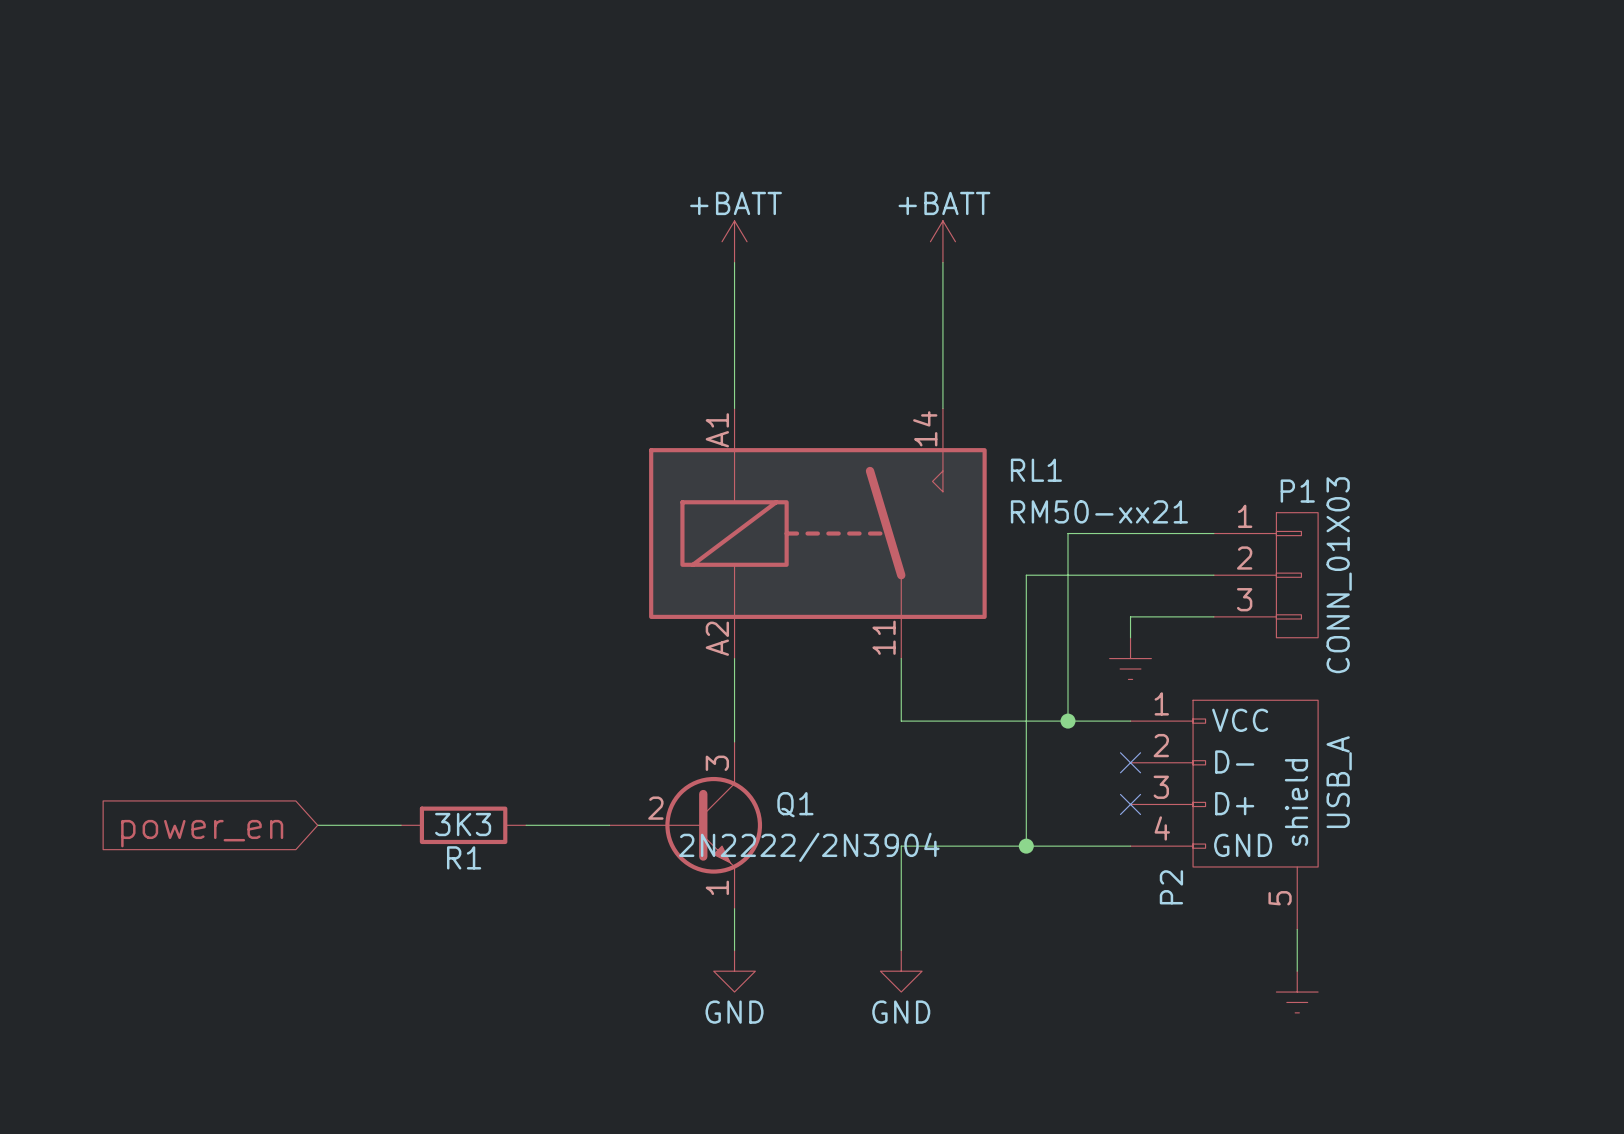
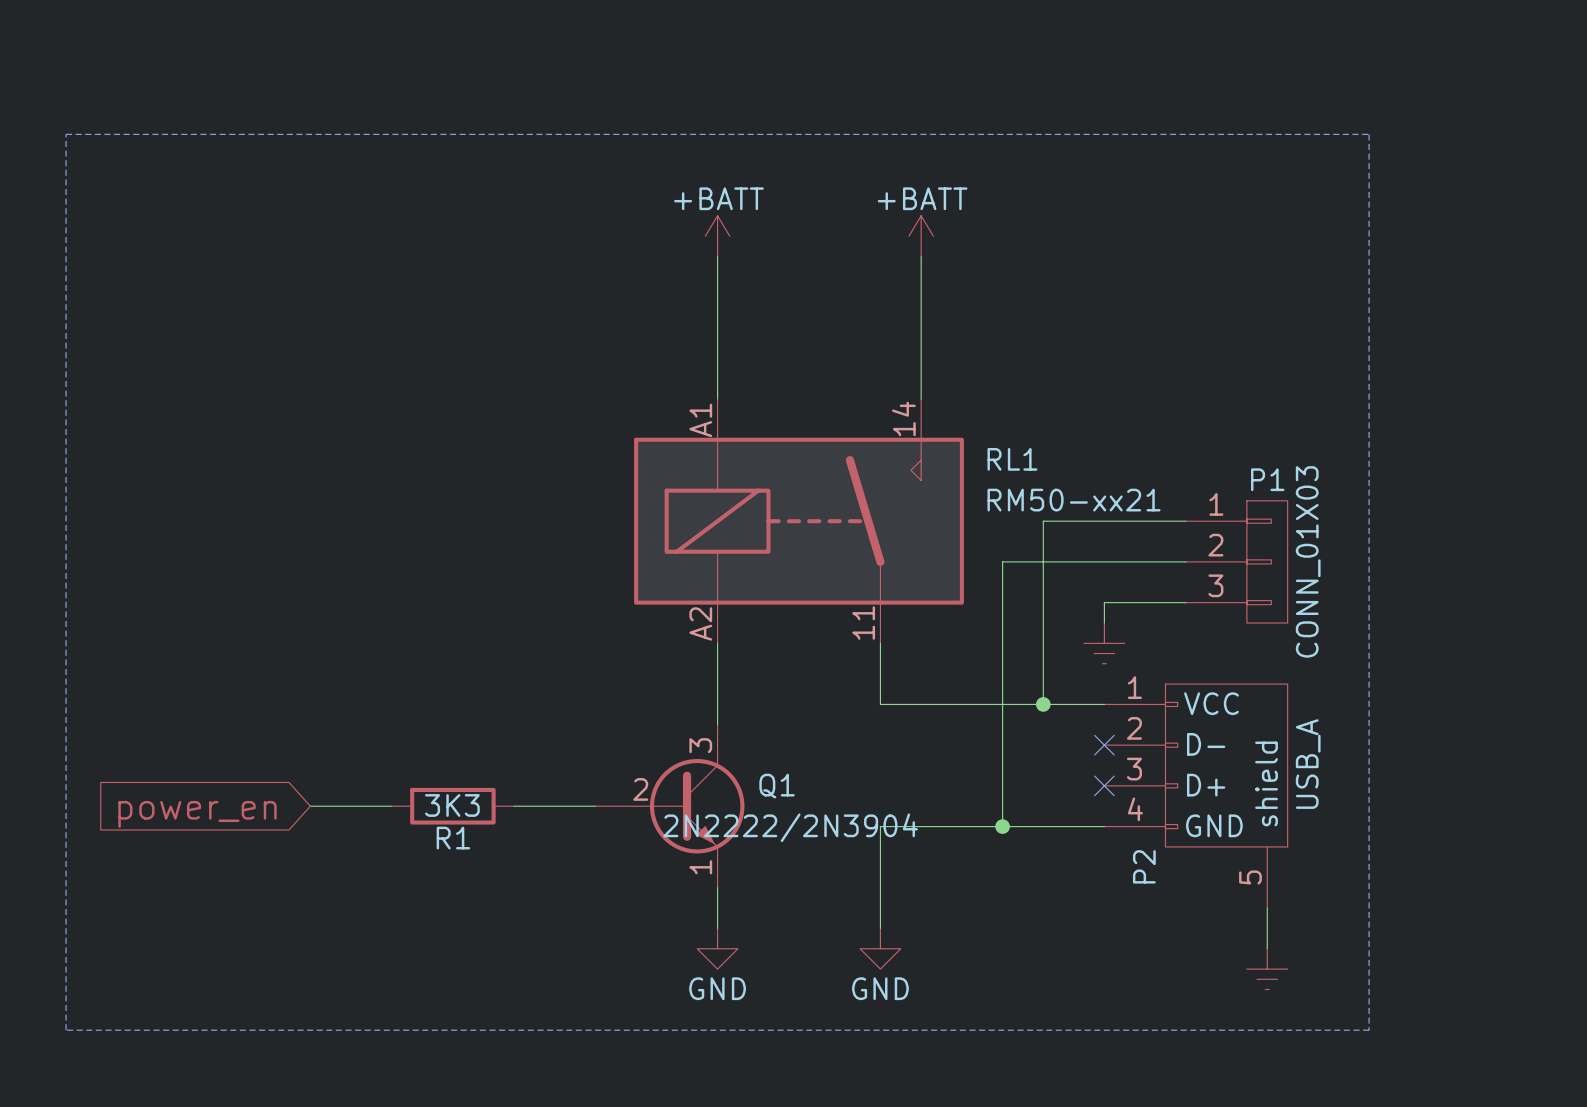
line: none -> (66, 134) (66, 1030) (1369, 1030) (1369, 134) (66, 134)

